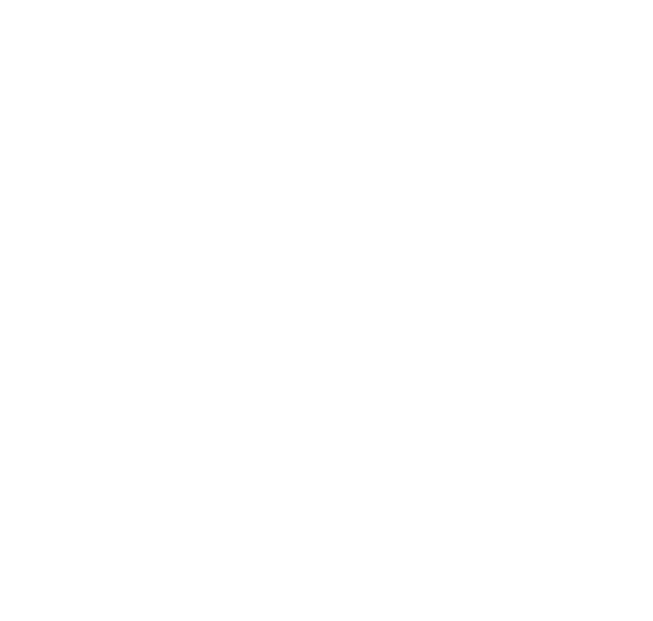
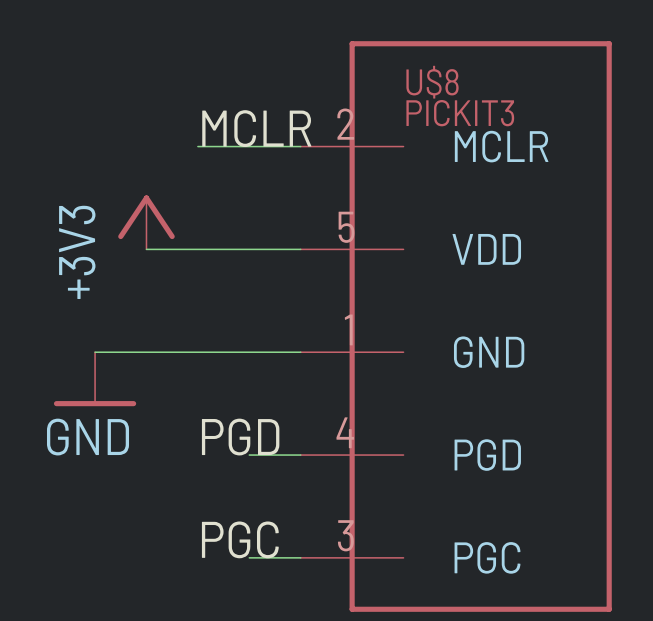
label: none -> MCLR (256, 128)
wire: none -> (197, 146) (300, 146)
power symbol: none -> +3V3 (146, 222)
wire: none -> (146, 249) (300, 249)
U$8: none -> PICKIT3 (456, 326)
wire: none -> (95, 352) (300, 352)
power symbol: none -> GND (95, 379)
label: none -> PGD (240, 437)
wire: none -> (249, 455) (300, 455)
label: none -> PGC (240, 539)
wire: none -> (249, 557) (300, 557)

